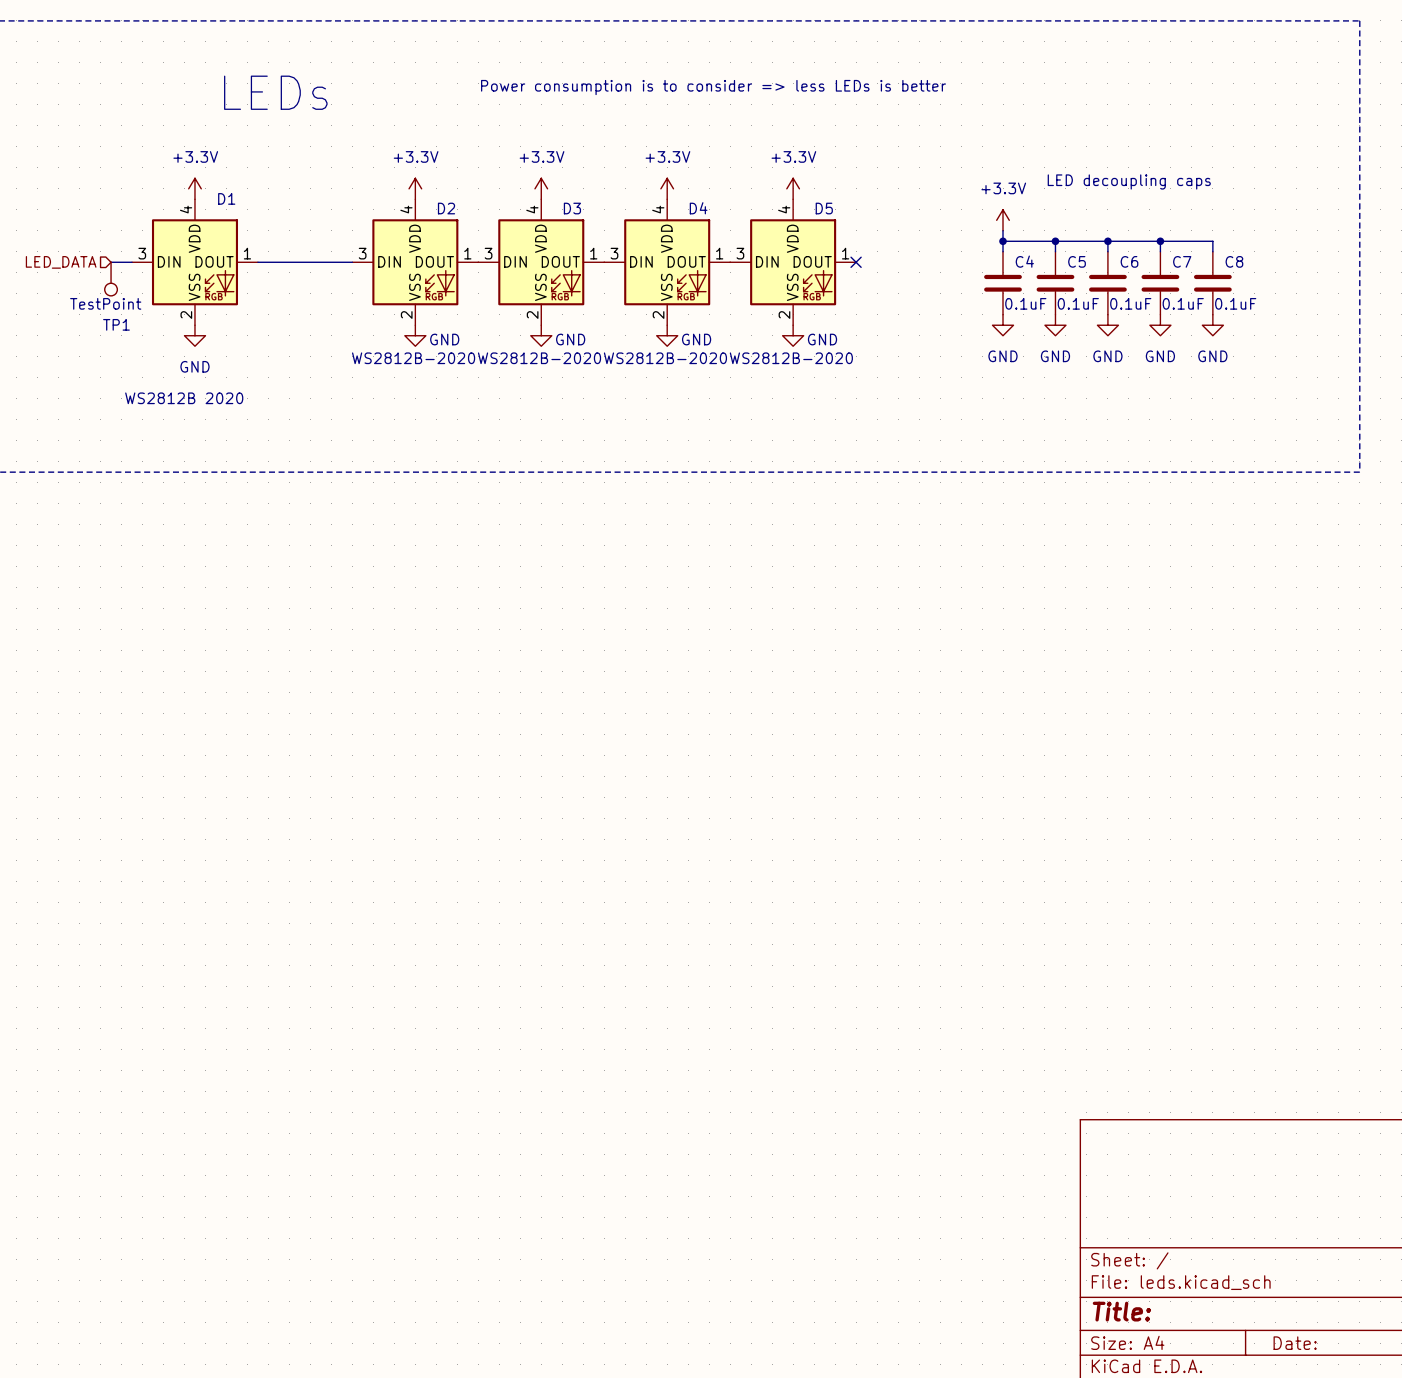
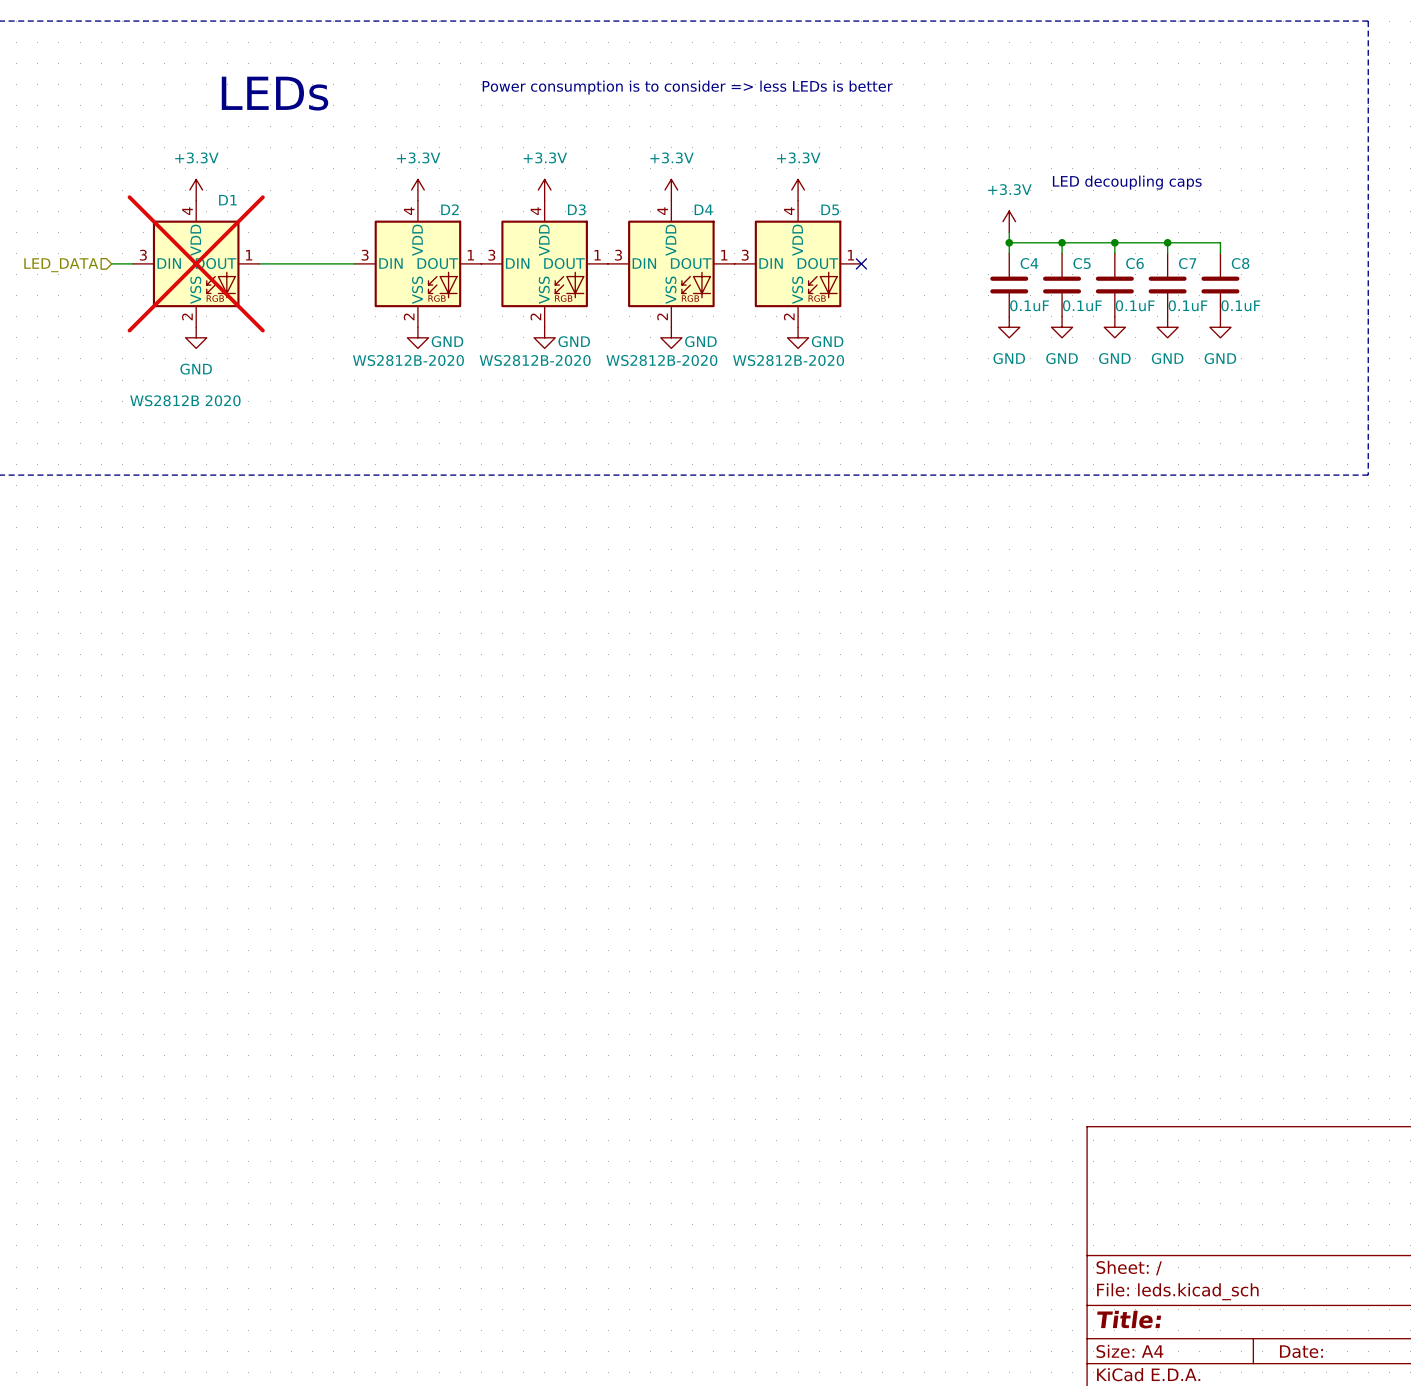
D1 do-not-place cross: none -> (196, 263)
TP1: TestPoint (111, 279) -> none

